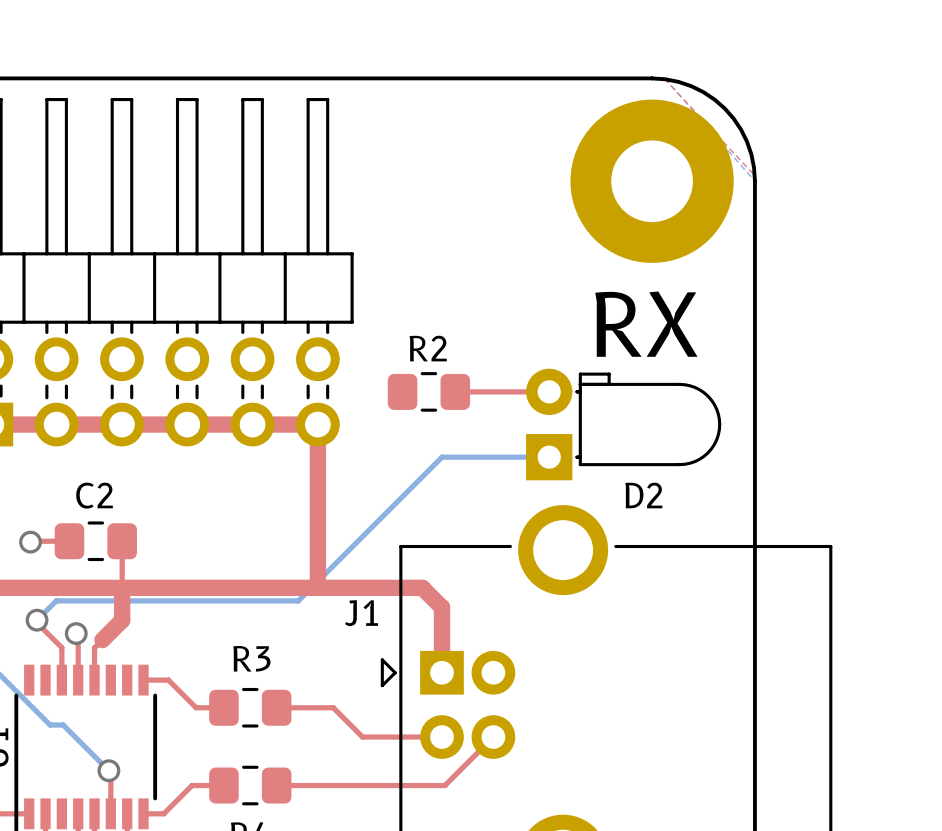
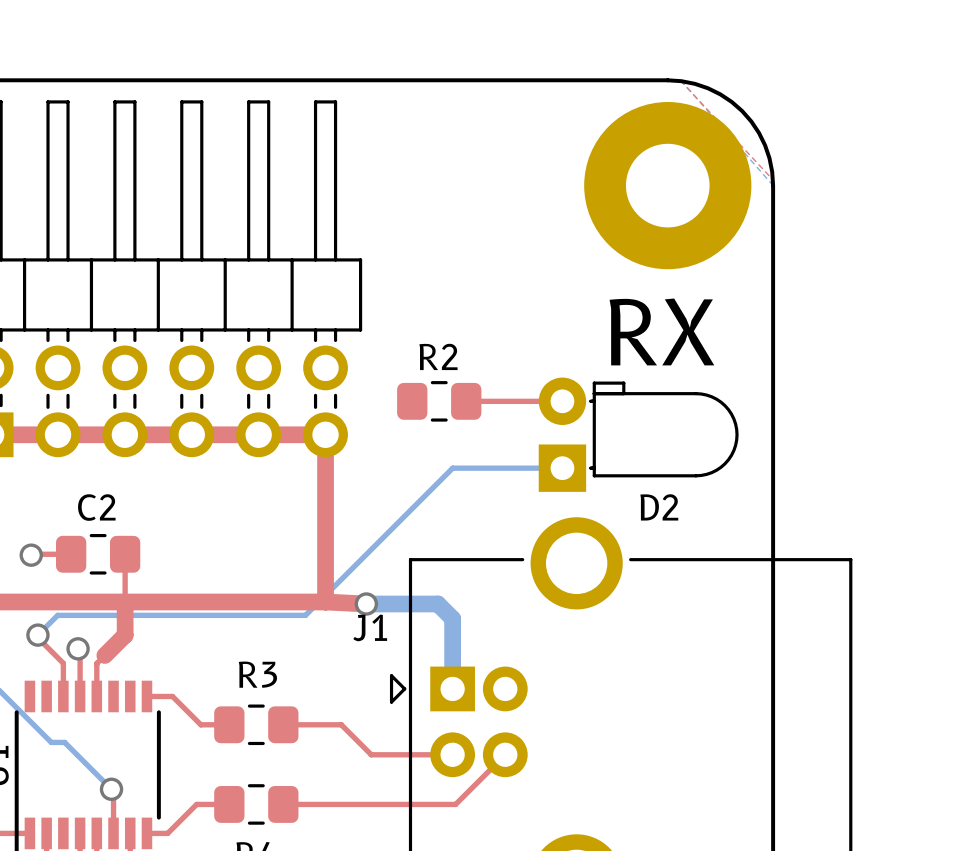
top track: (317, 587) (422, 587) (441, 607) (441, 672) -> (325, 601) (366, 604)
bottom track: none -> (366, 604) (437, 604) (452, 618) (452, 688)
via: none -> (366, 604)

